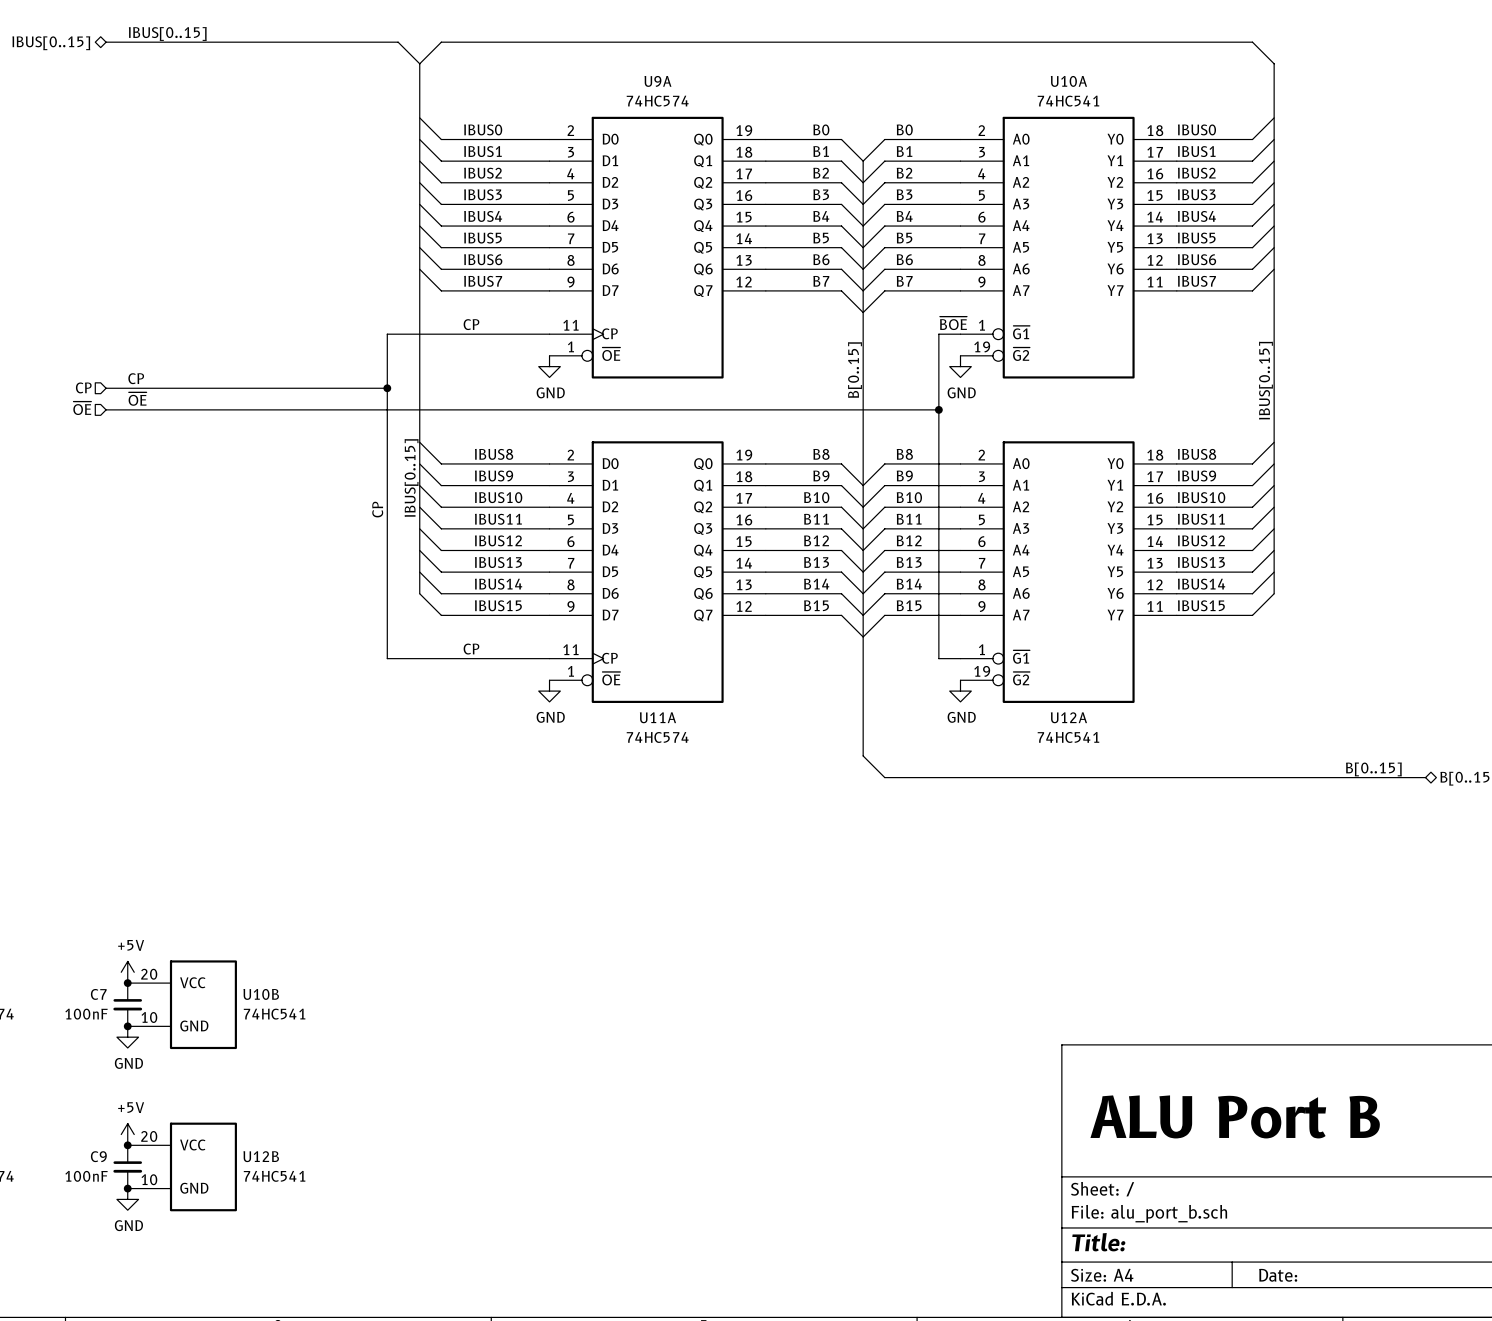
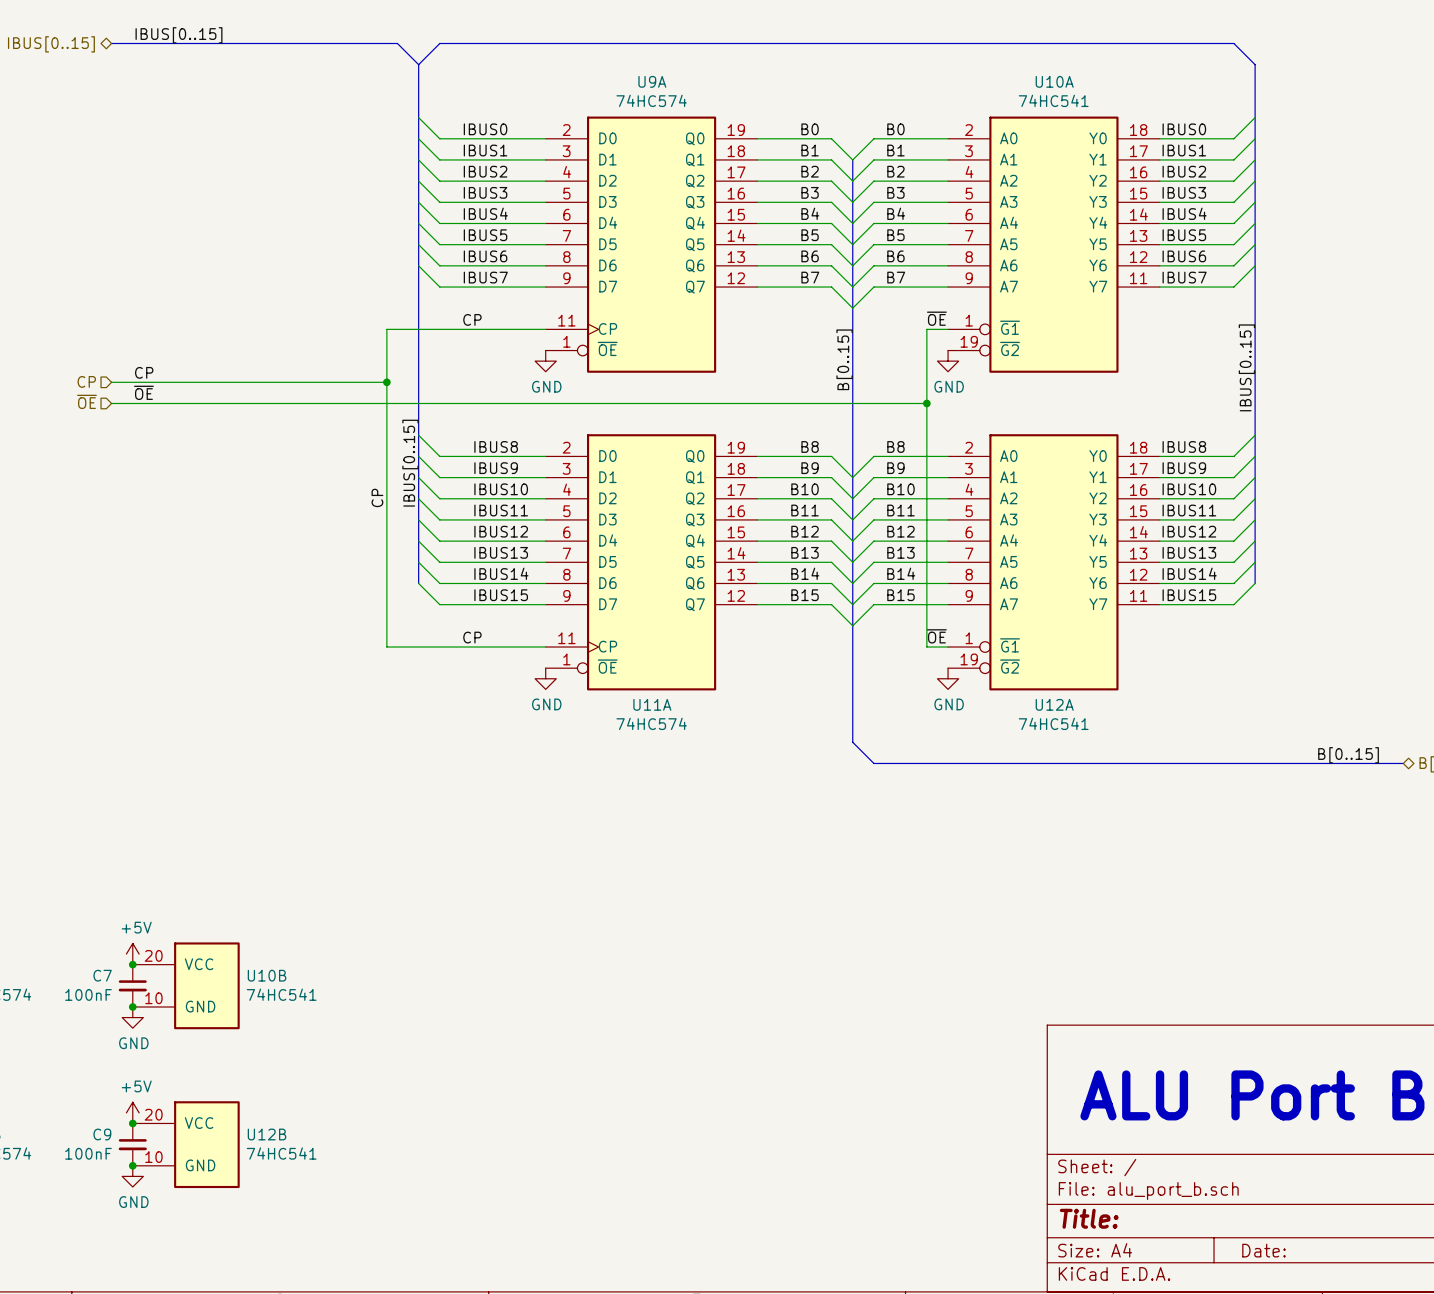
label: ~{BOE} (953, 323) -> ~{OE} (936, 318)
label: none -> ~{OE} (936, 636)

